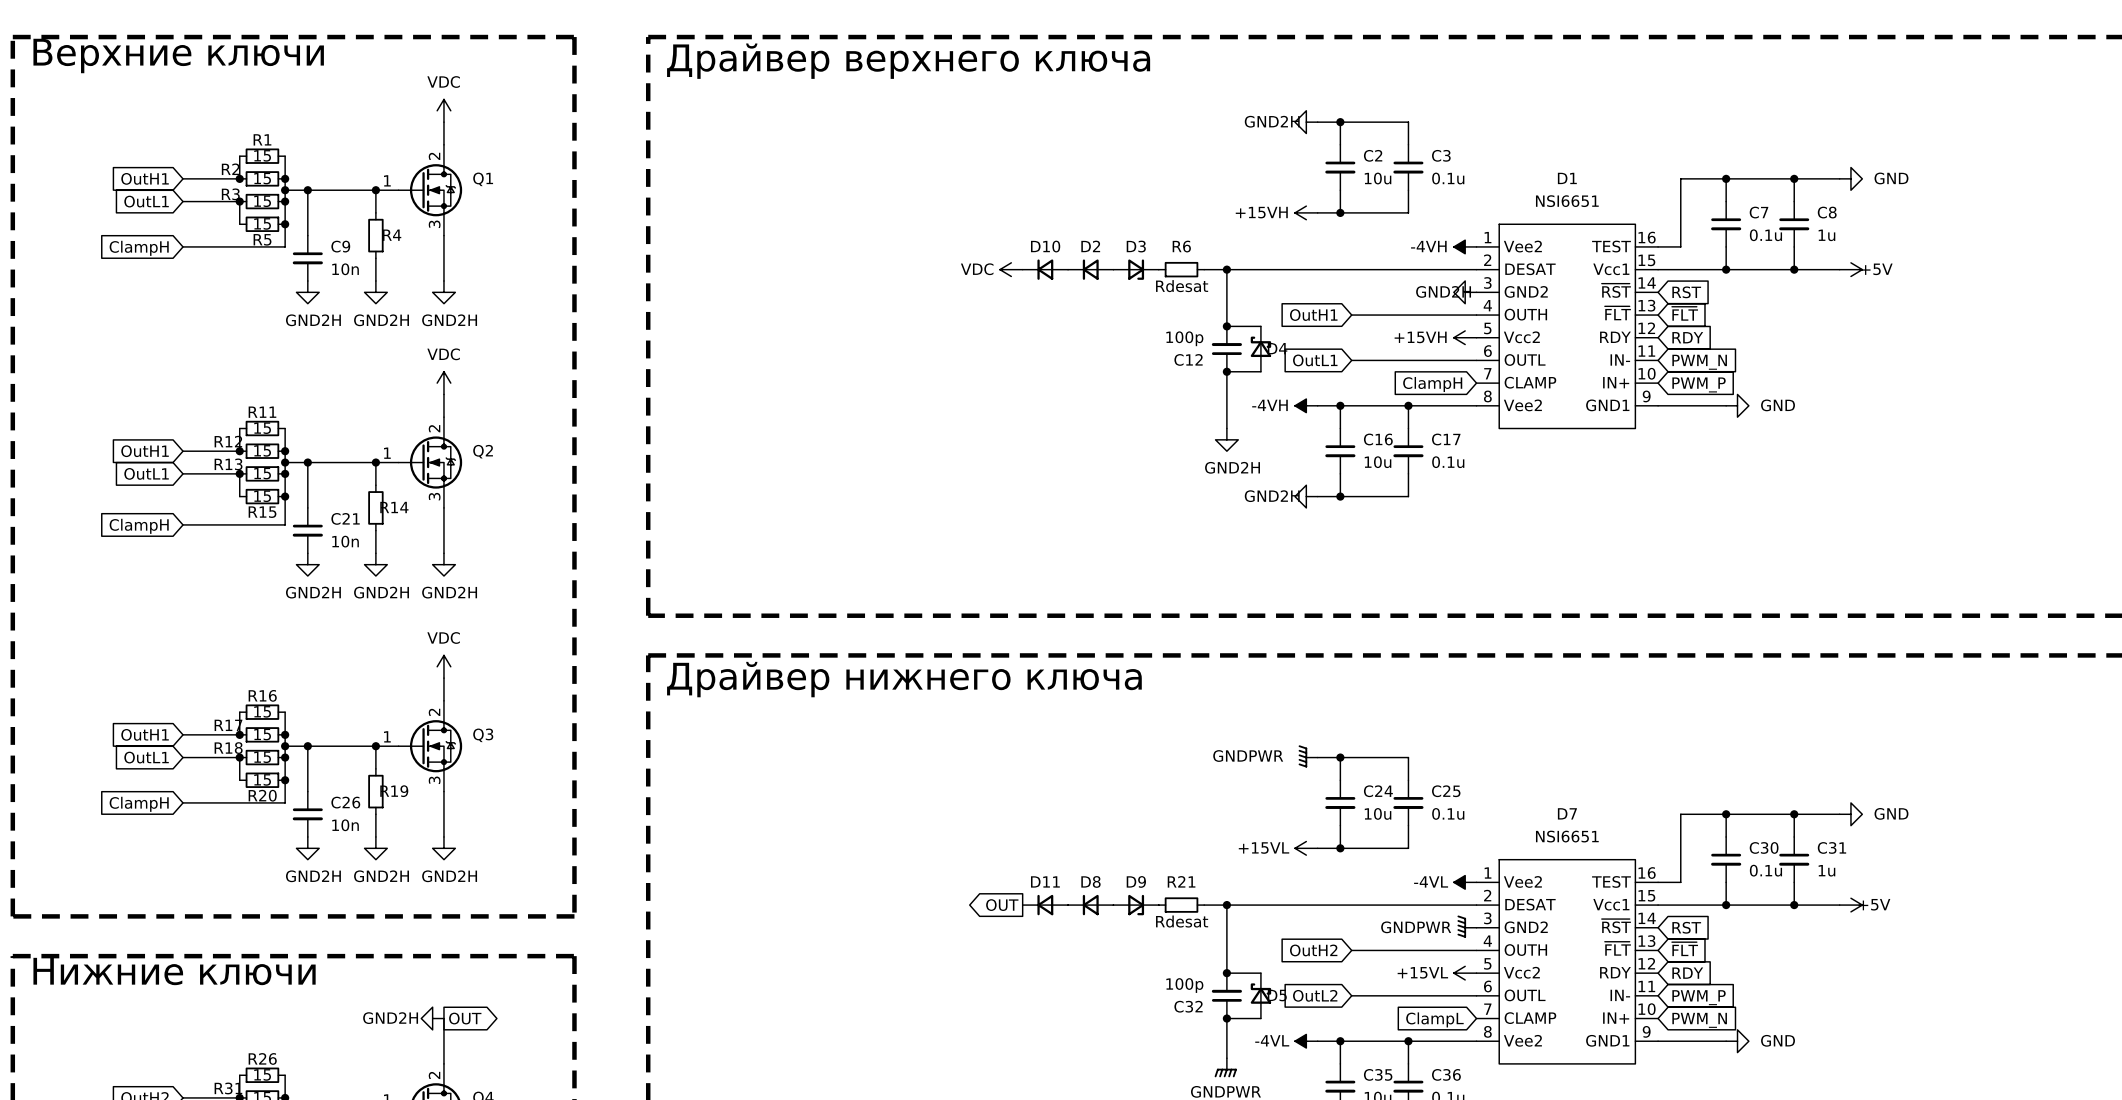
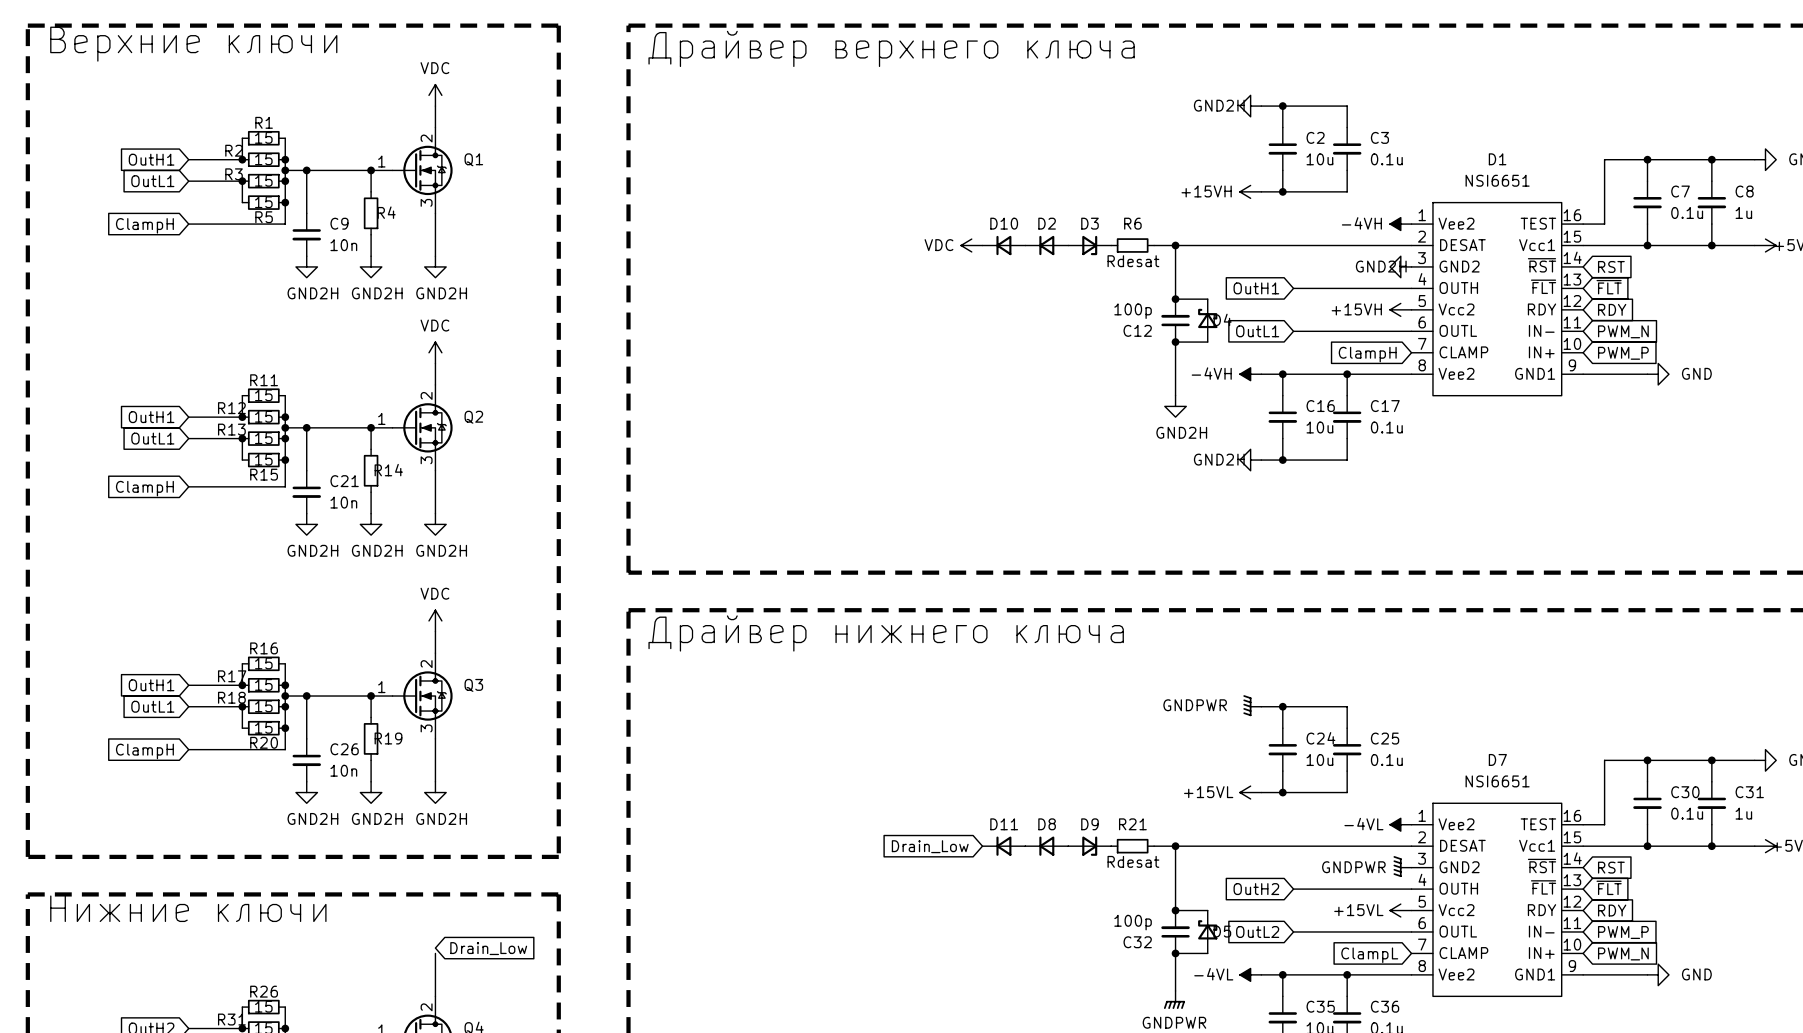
global label shape: output (1002, 905) -> input (930, 846)
global label: OUT (1002, 905) -> Drain_Low (930, 846)
power symbol: GND2H (432, 1018) -> none
global label shape: output (465, 1018) -> input (488, 948)
global label: OUT (465, 1018) -> Drain_Low (488, 948)

